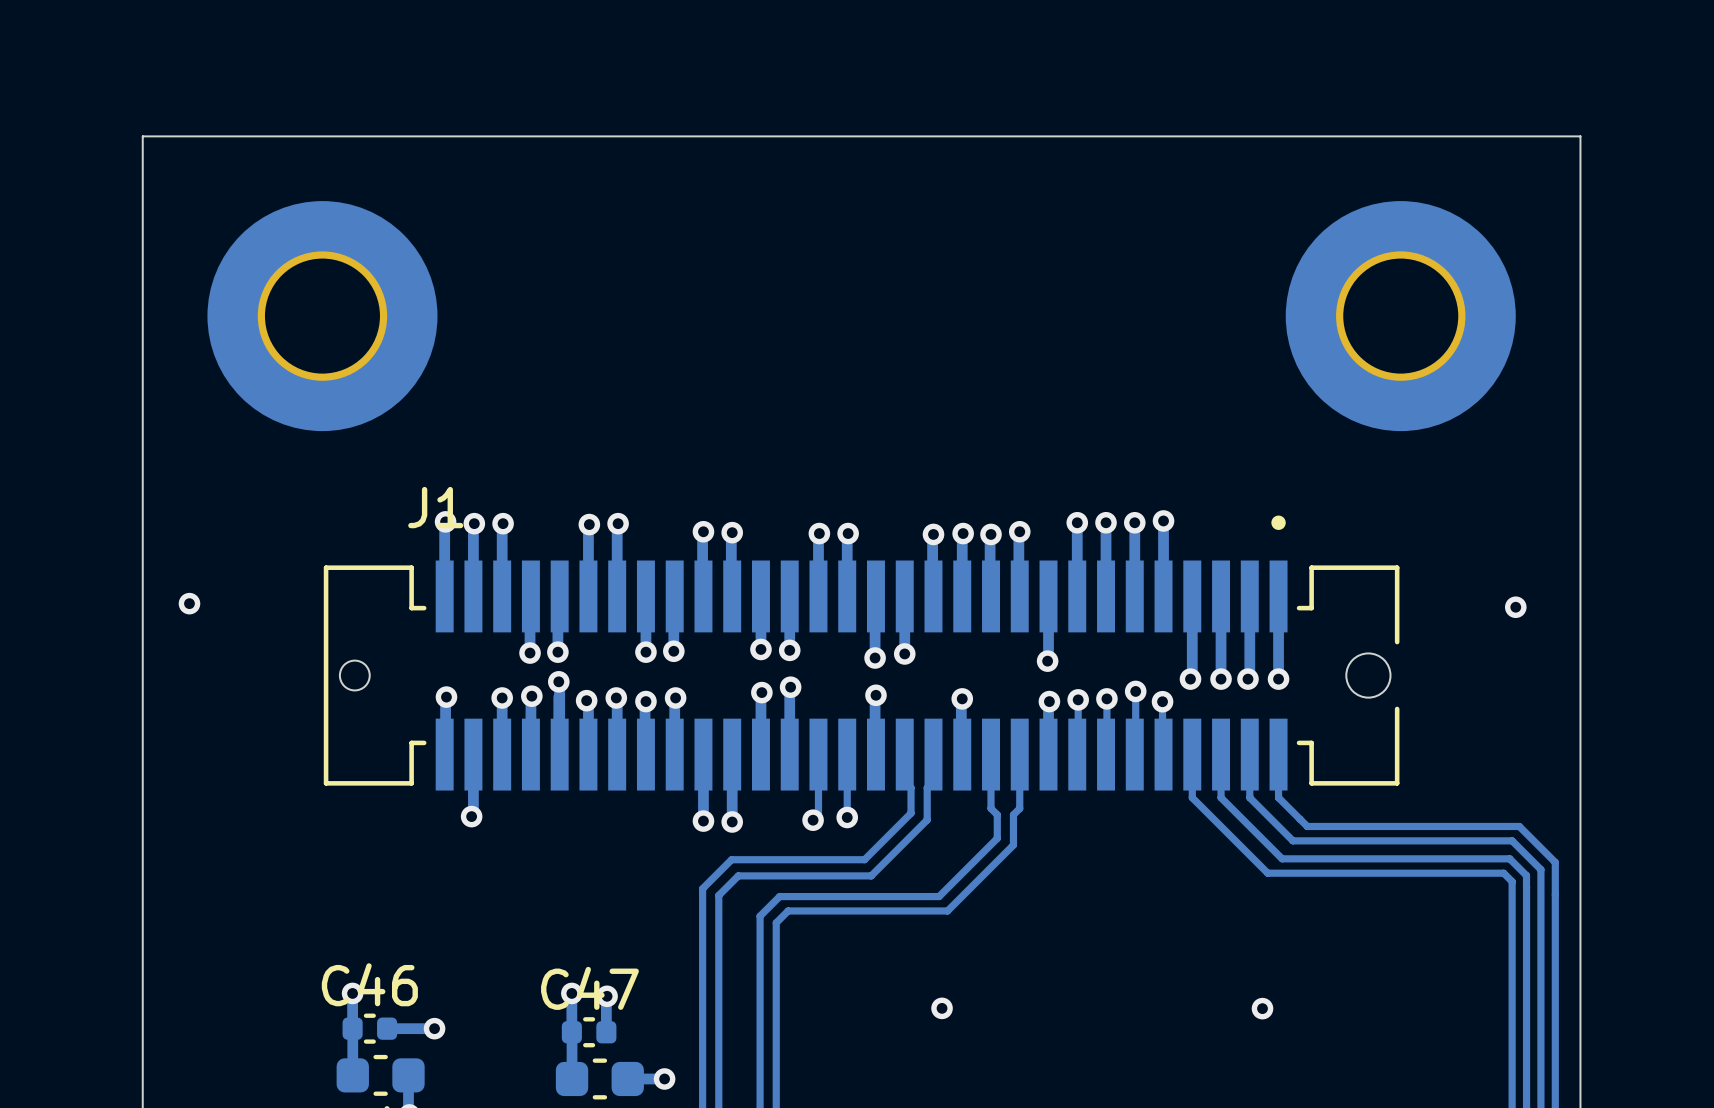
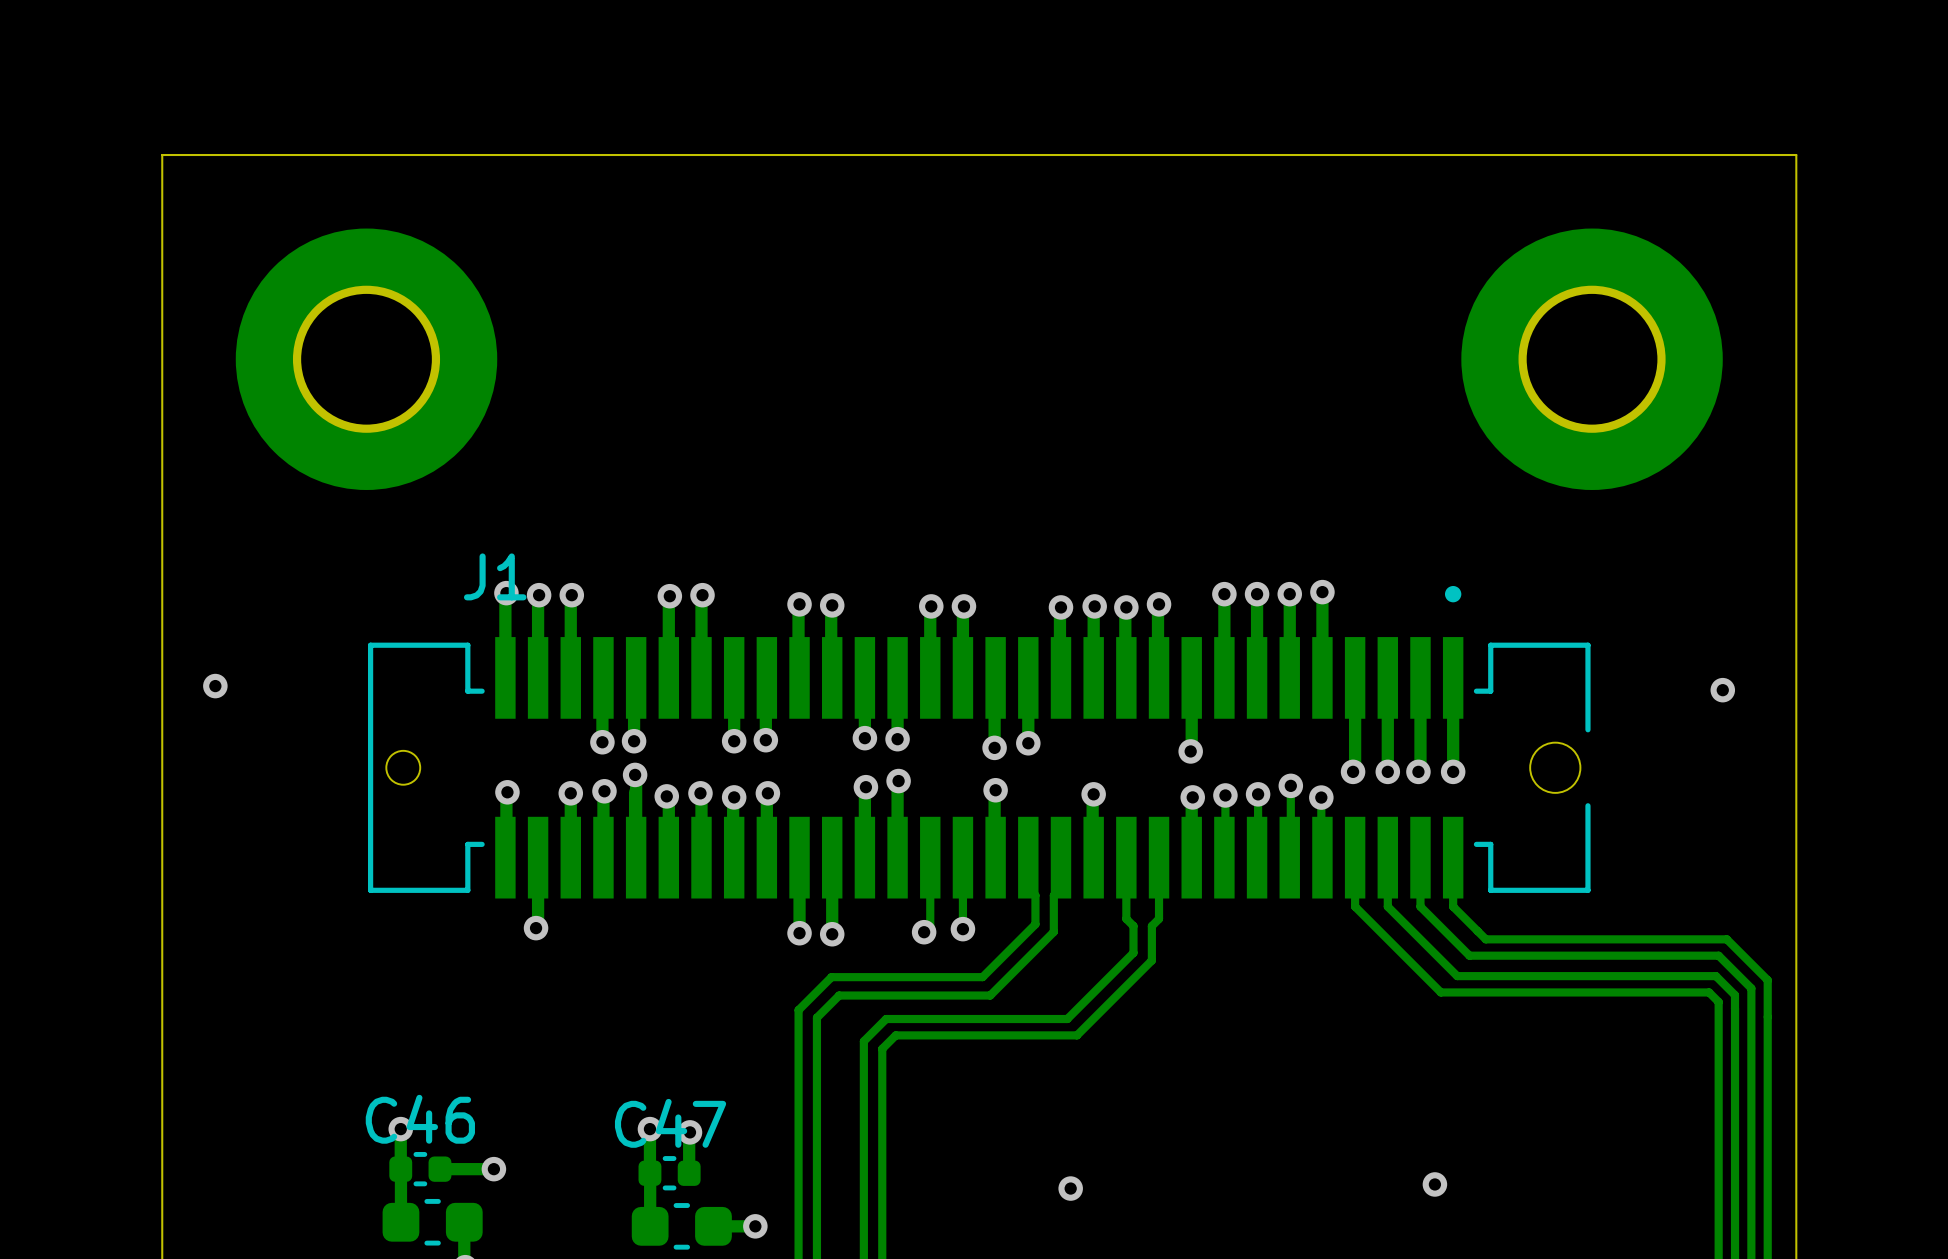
via position: (942, 1008) -> (1070, 1188)
via position: (1262, 1008) -> (1434, 1184)

